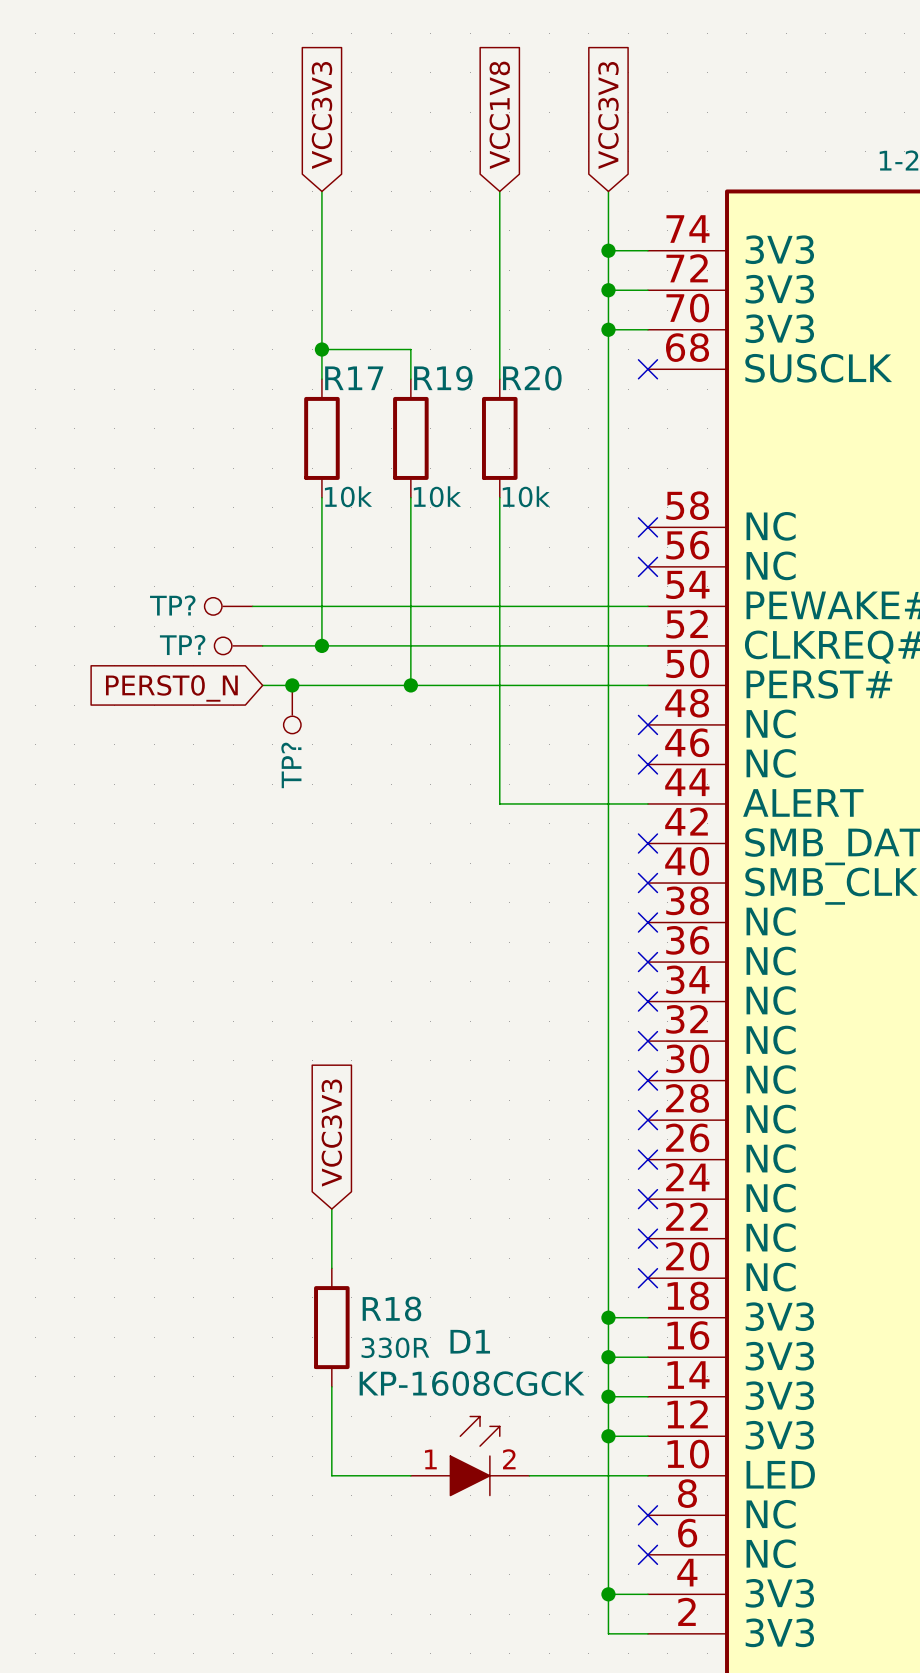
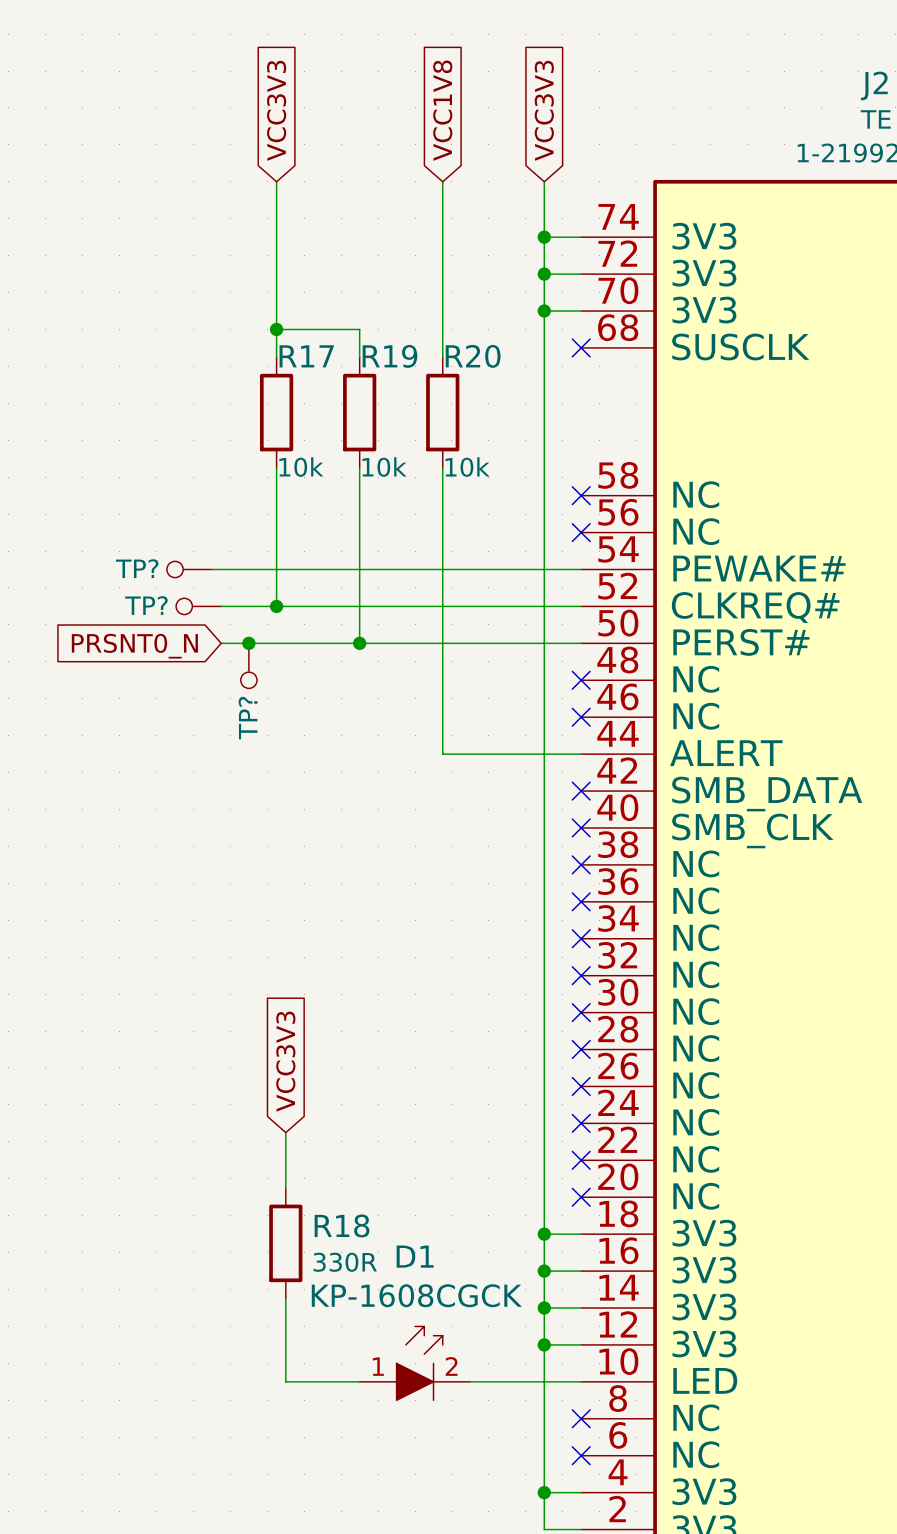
global label: PERST0_N (171, 688) -> PRSNT0_N (134, 646)

